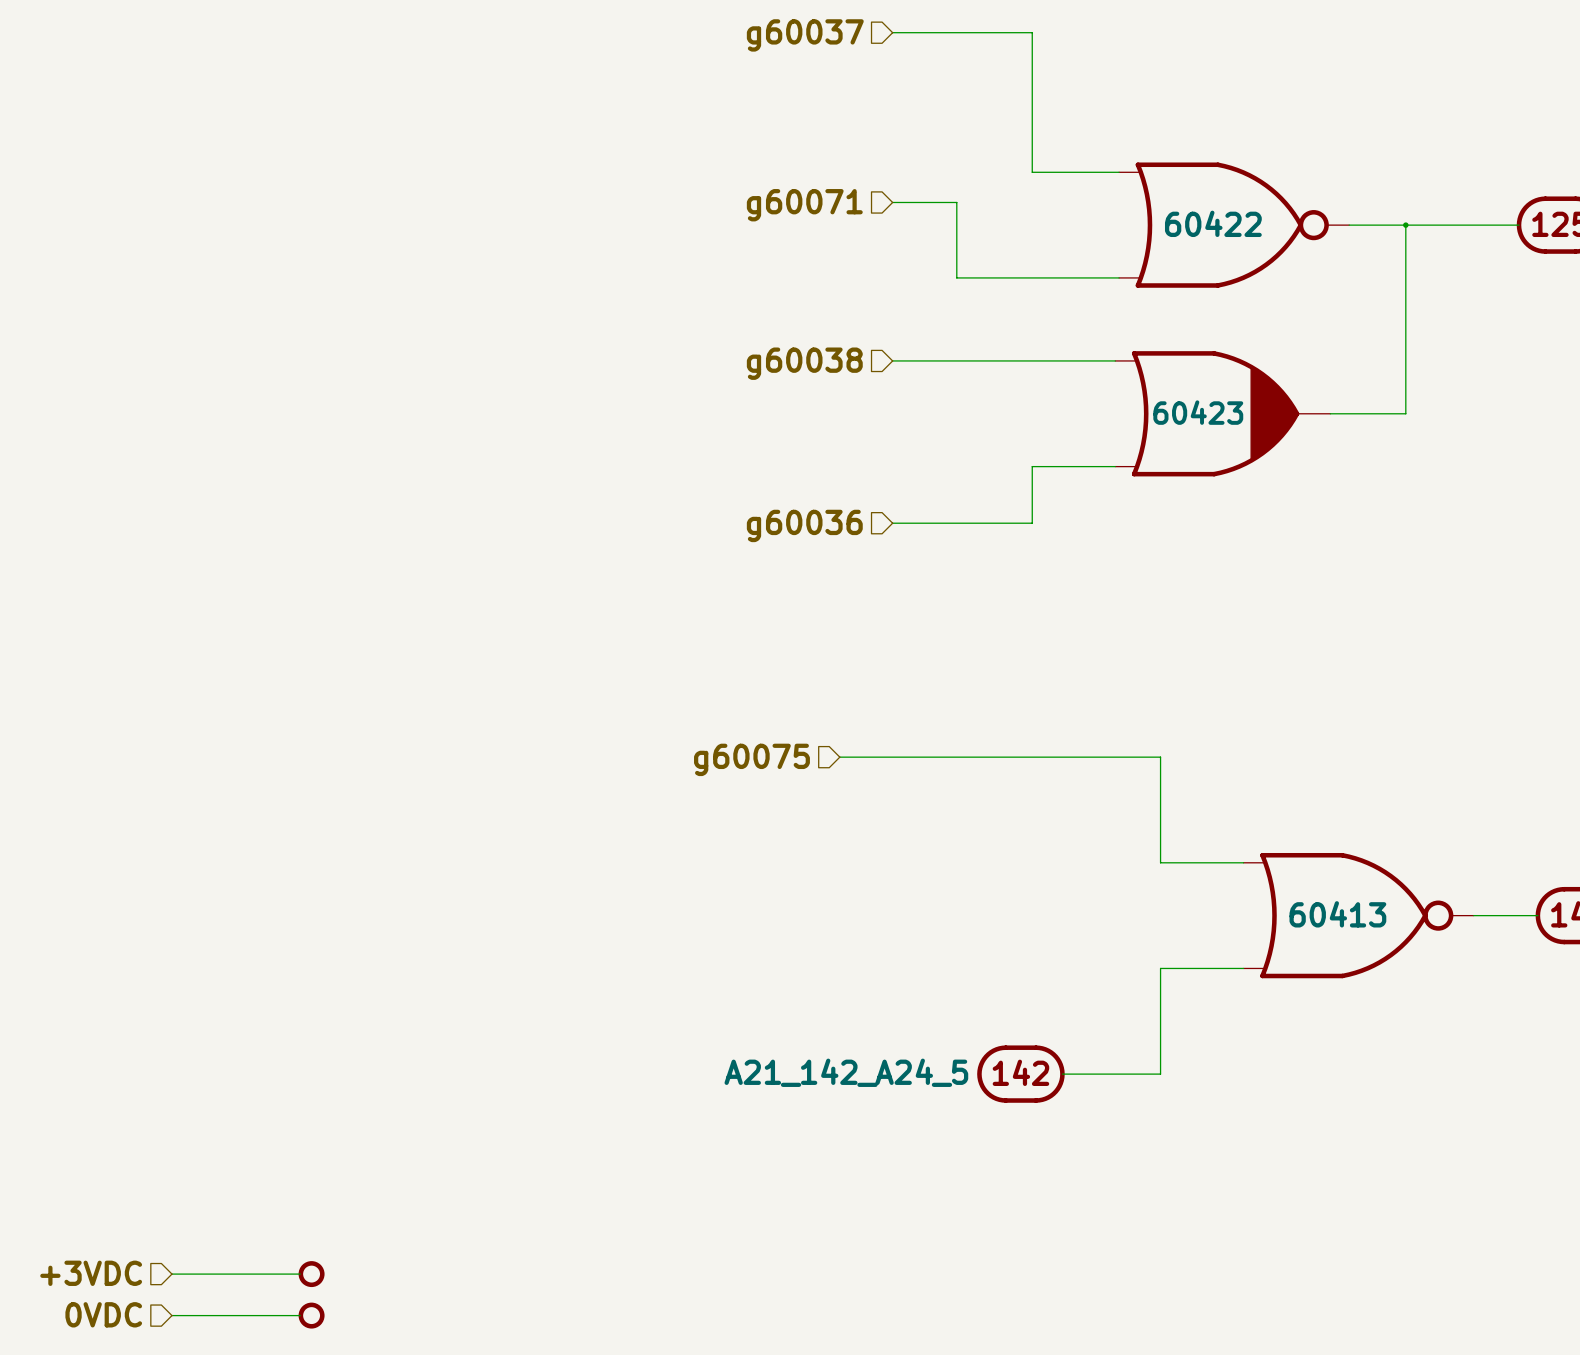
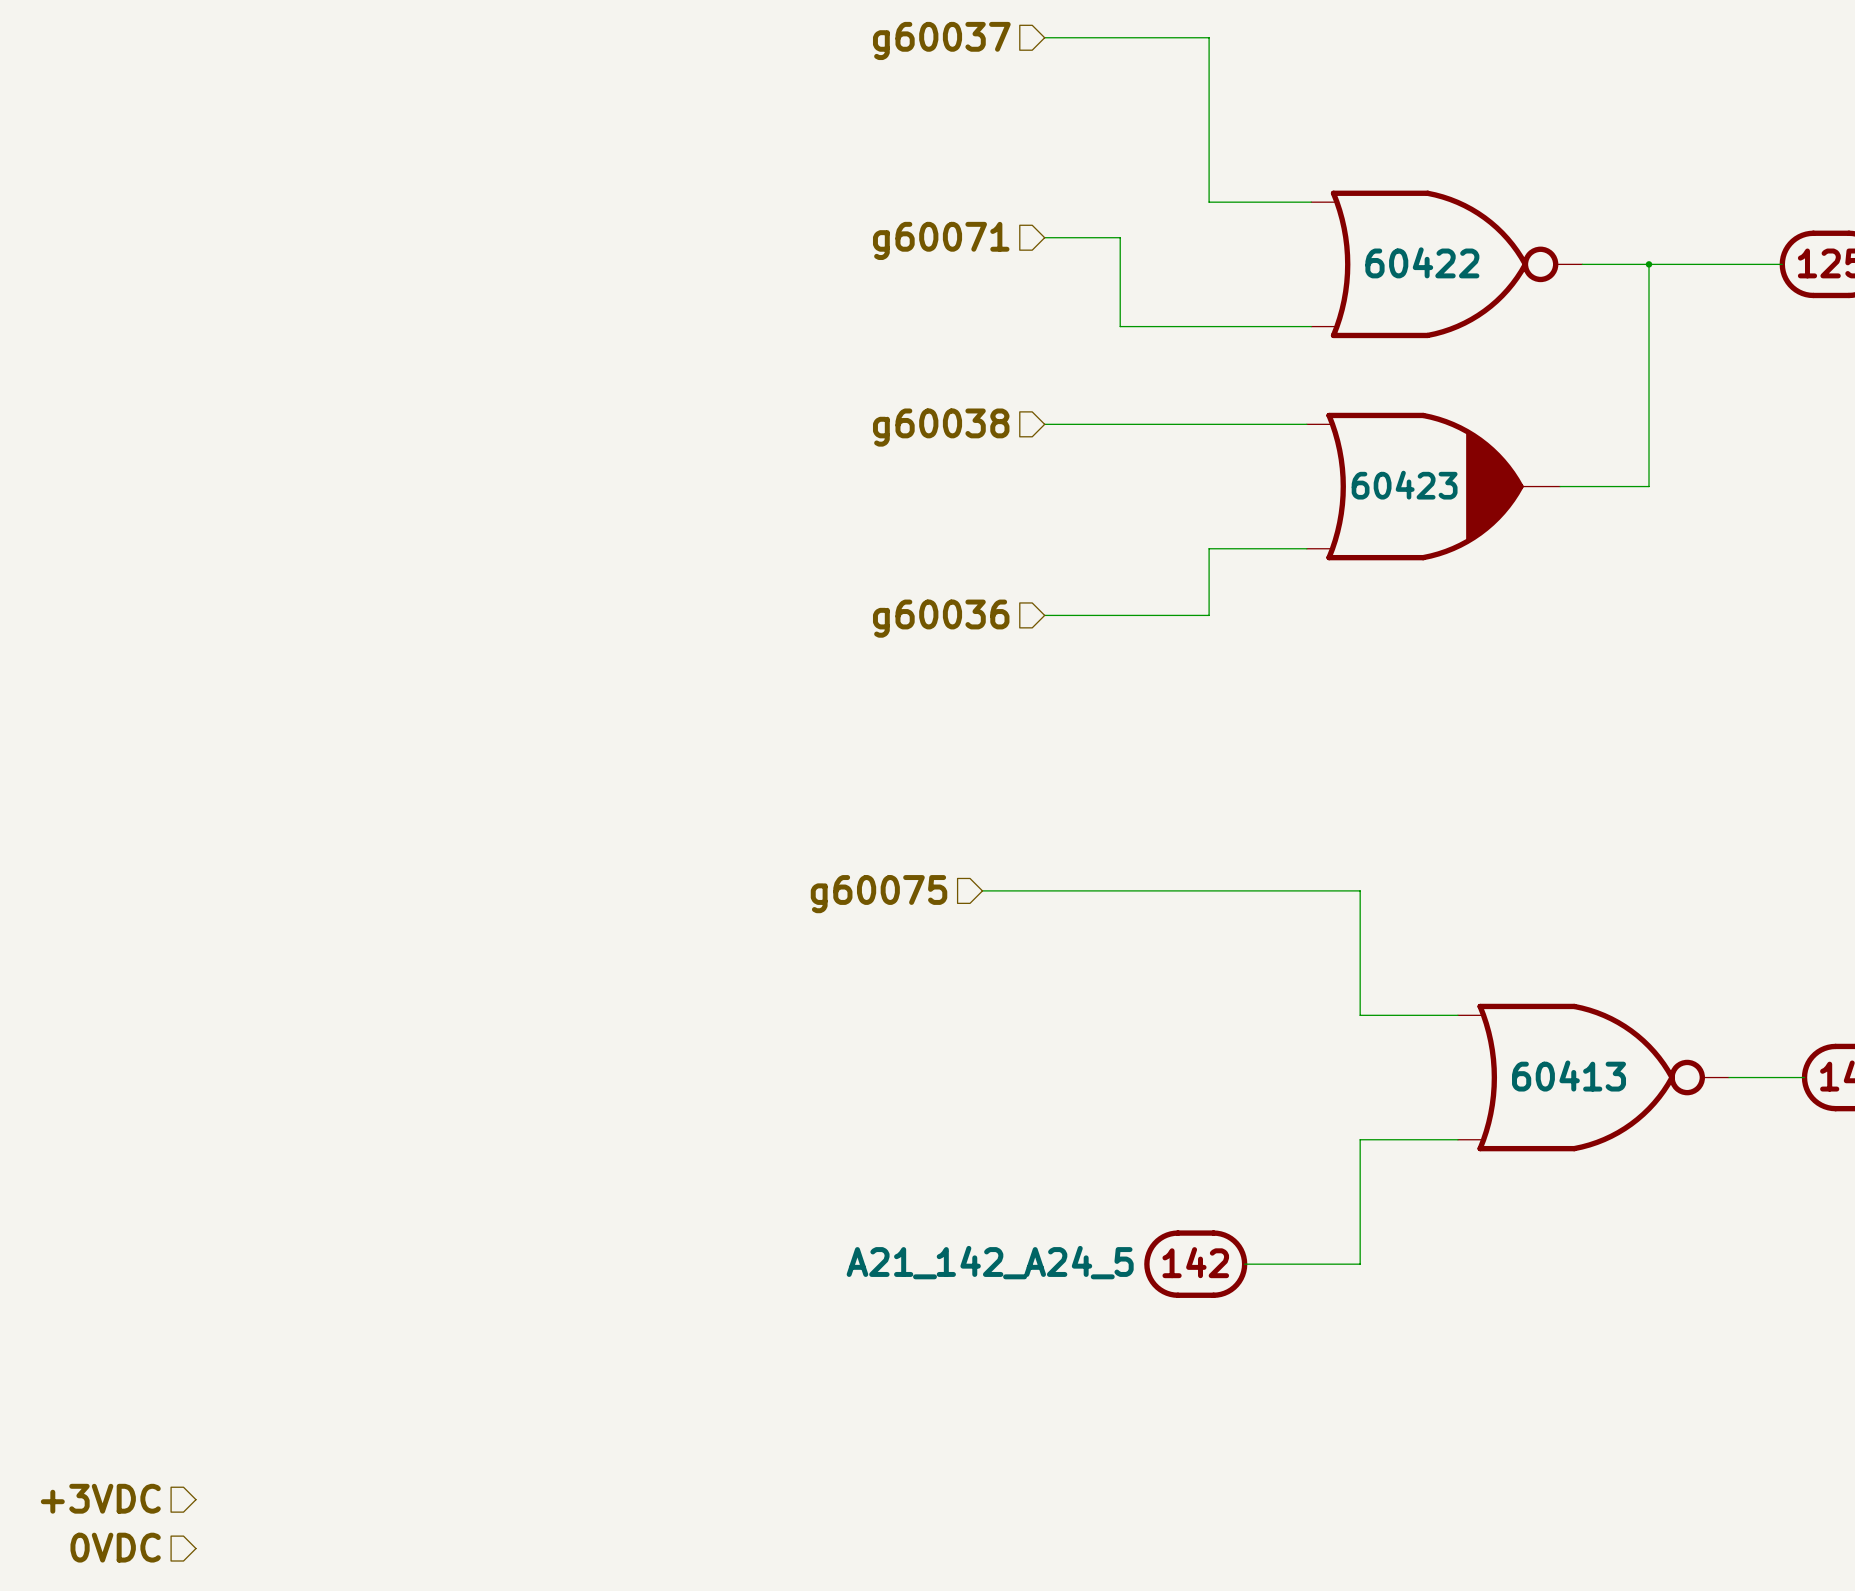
wire: (171, 1274) (300, 1274) -> none
part: (311, 1274) -> none
wire: (171, 1315) (300, 1315) -> none
part: (311, 1315) -> none

